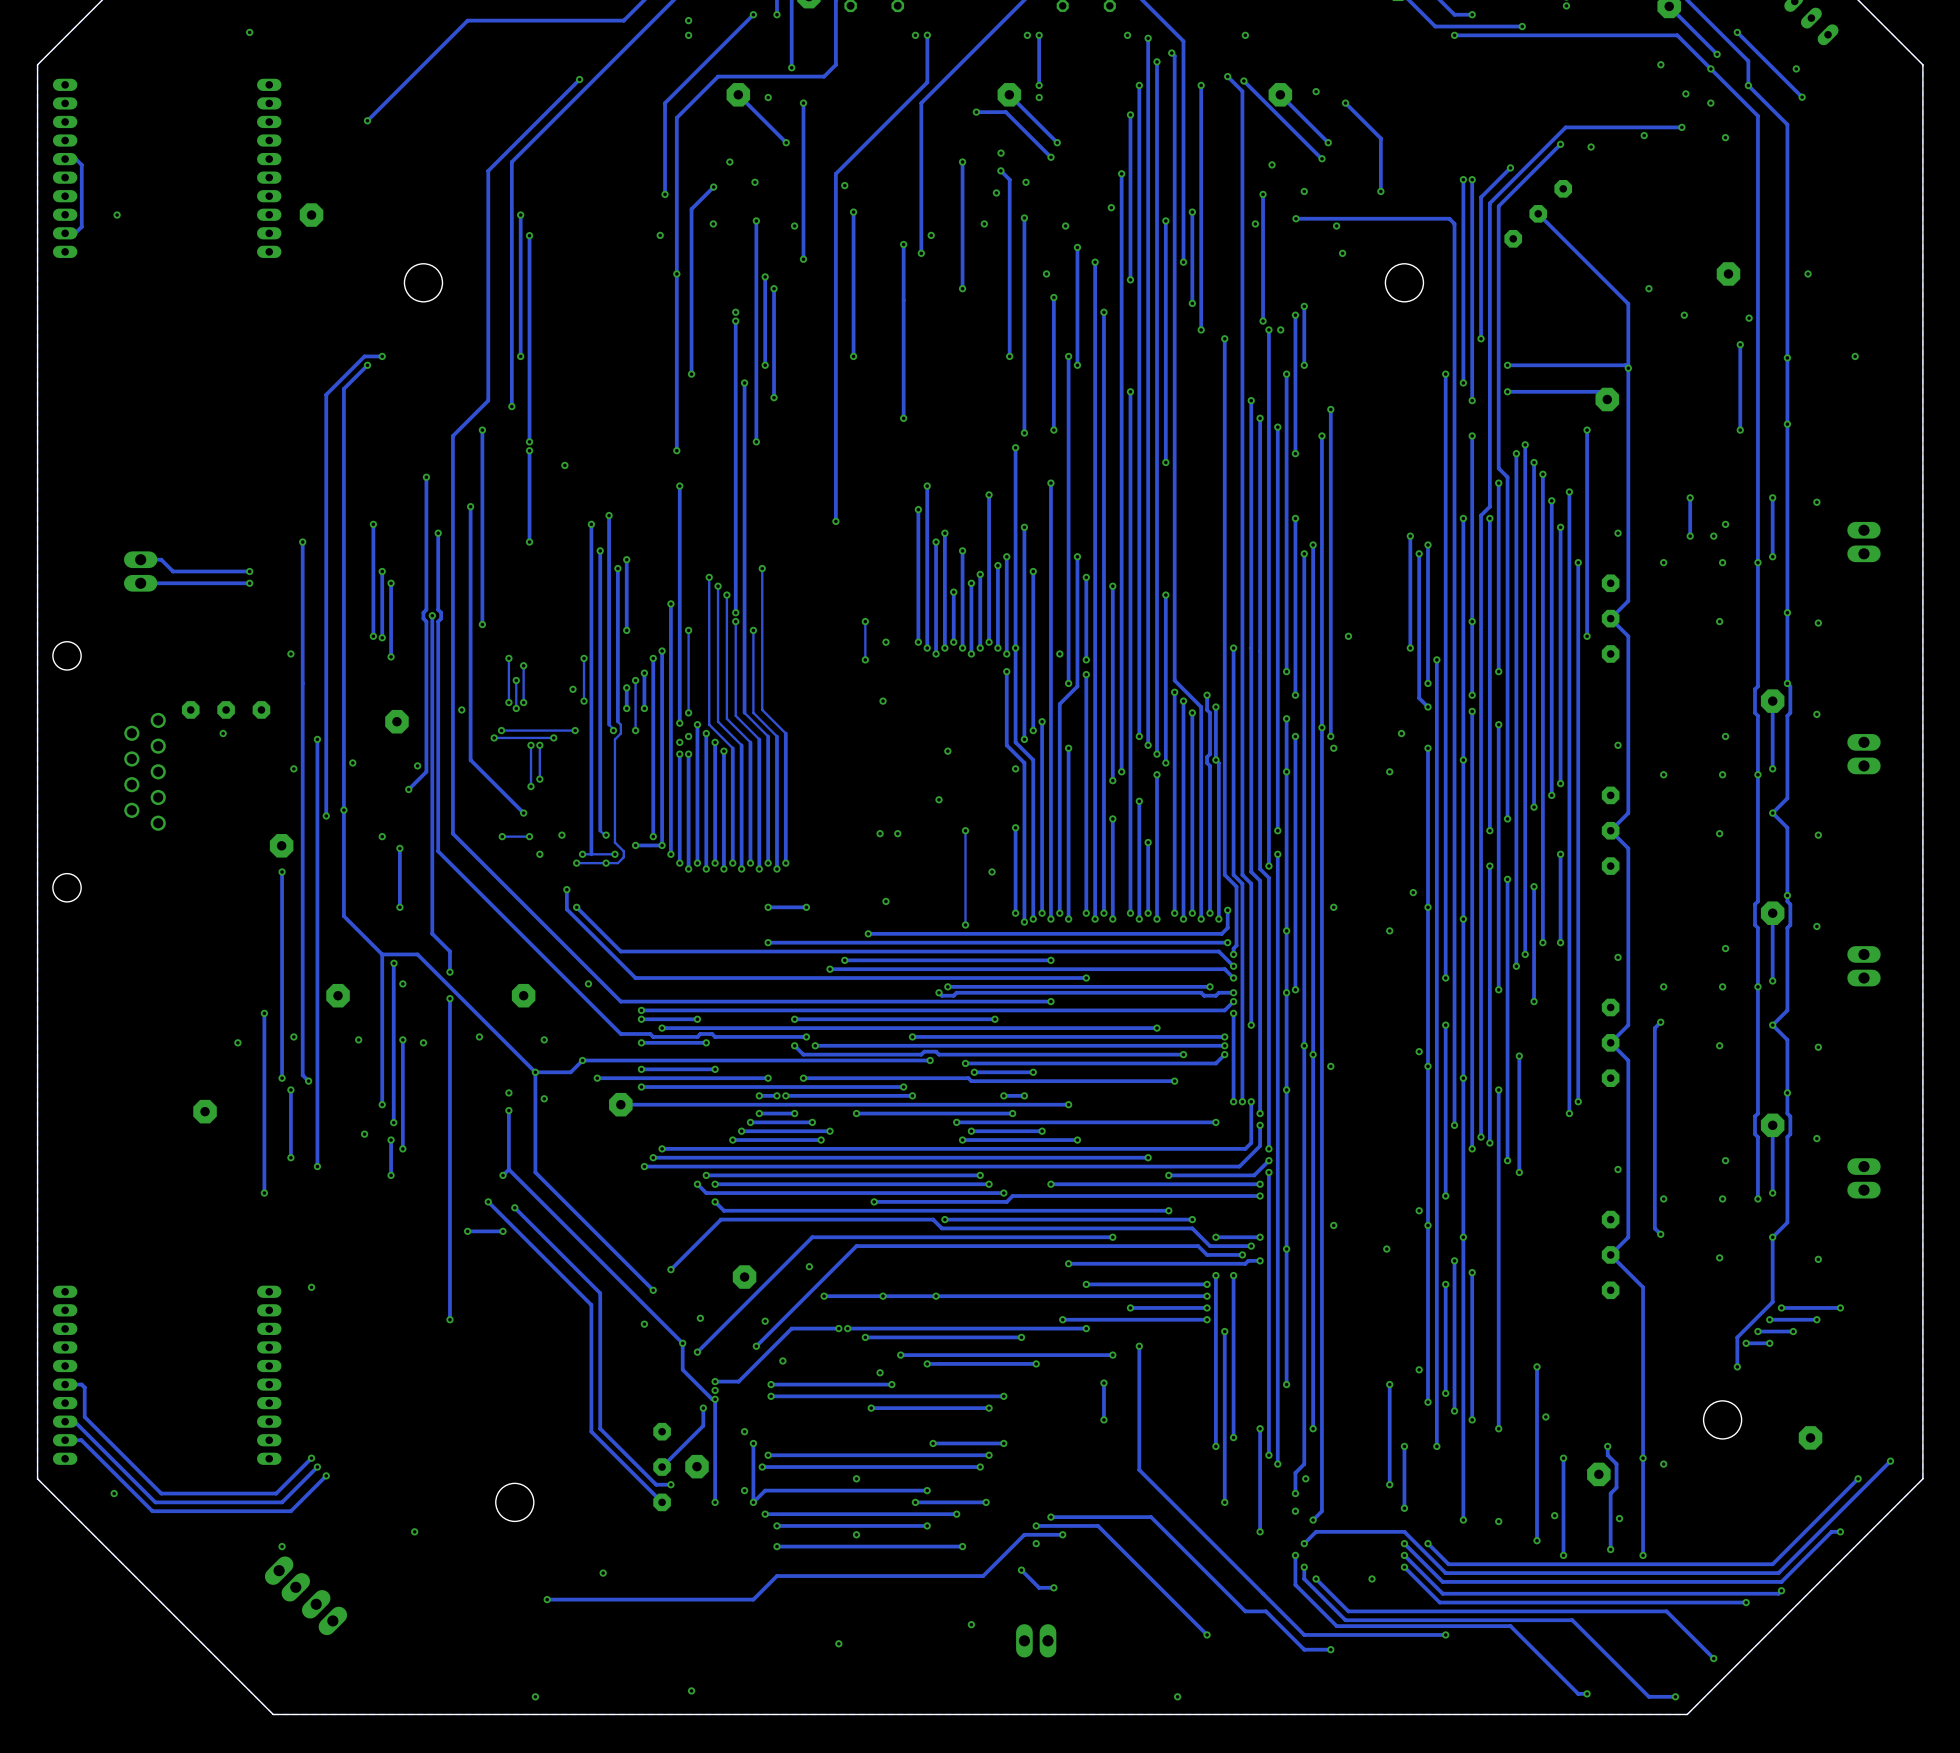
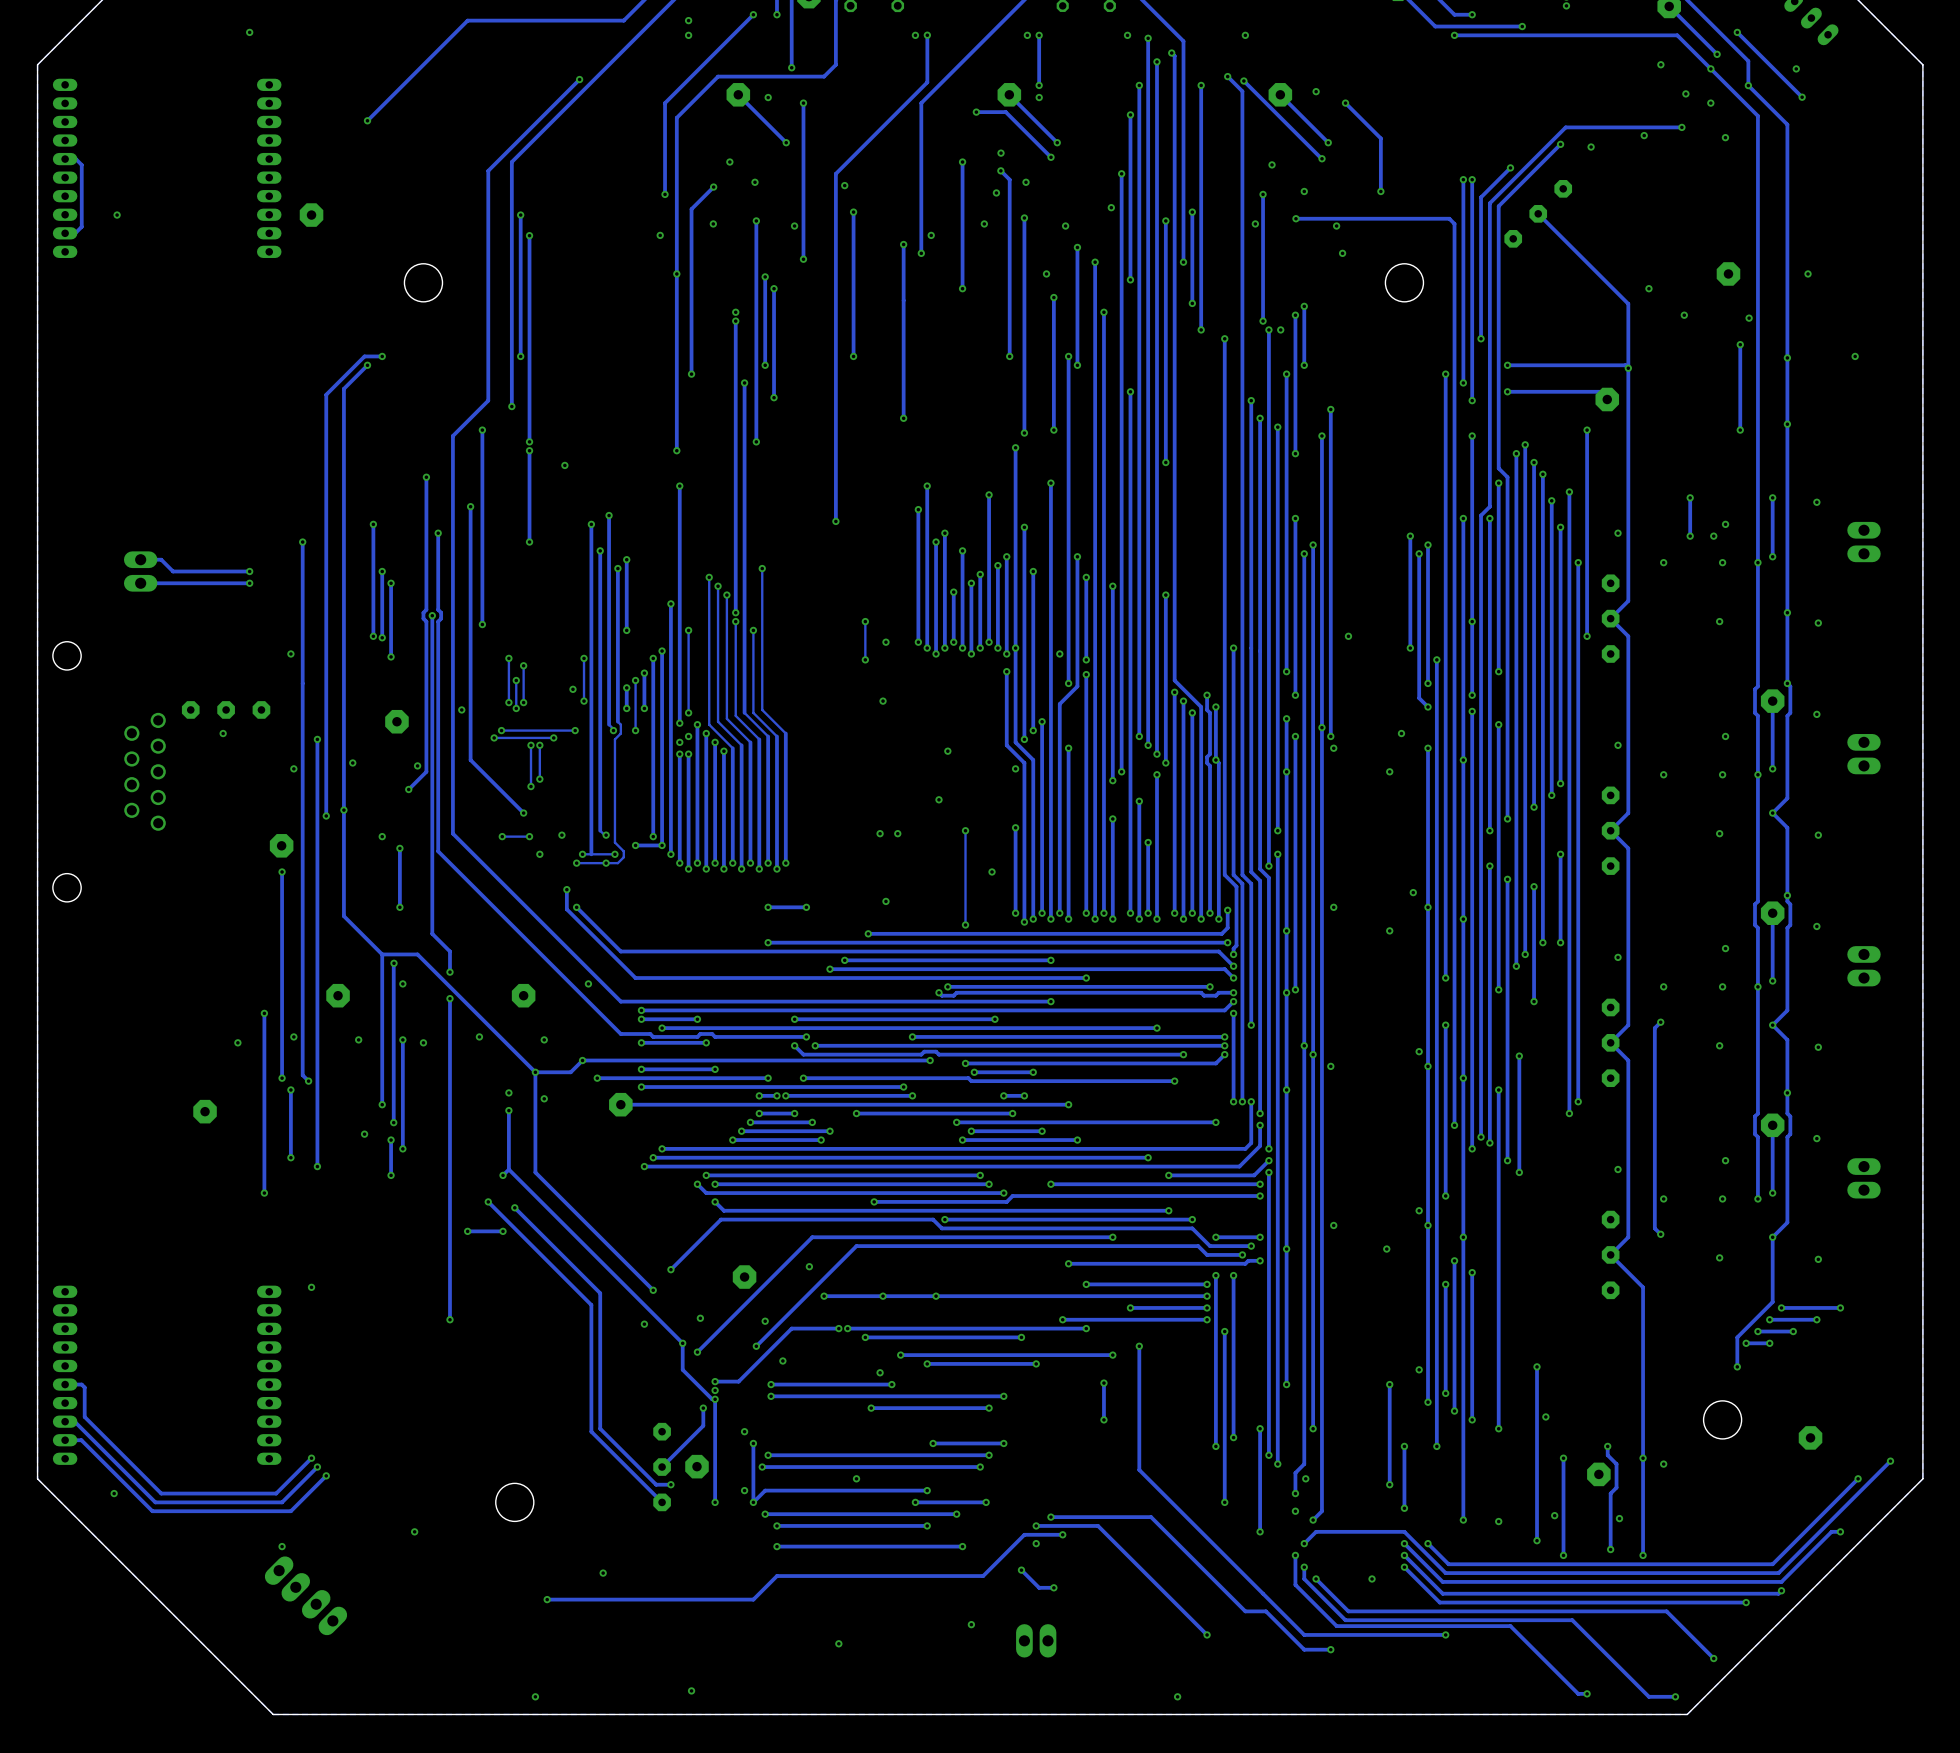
via: (856, 1534) -> none

